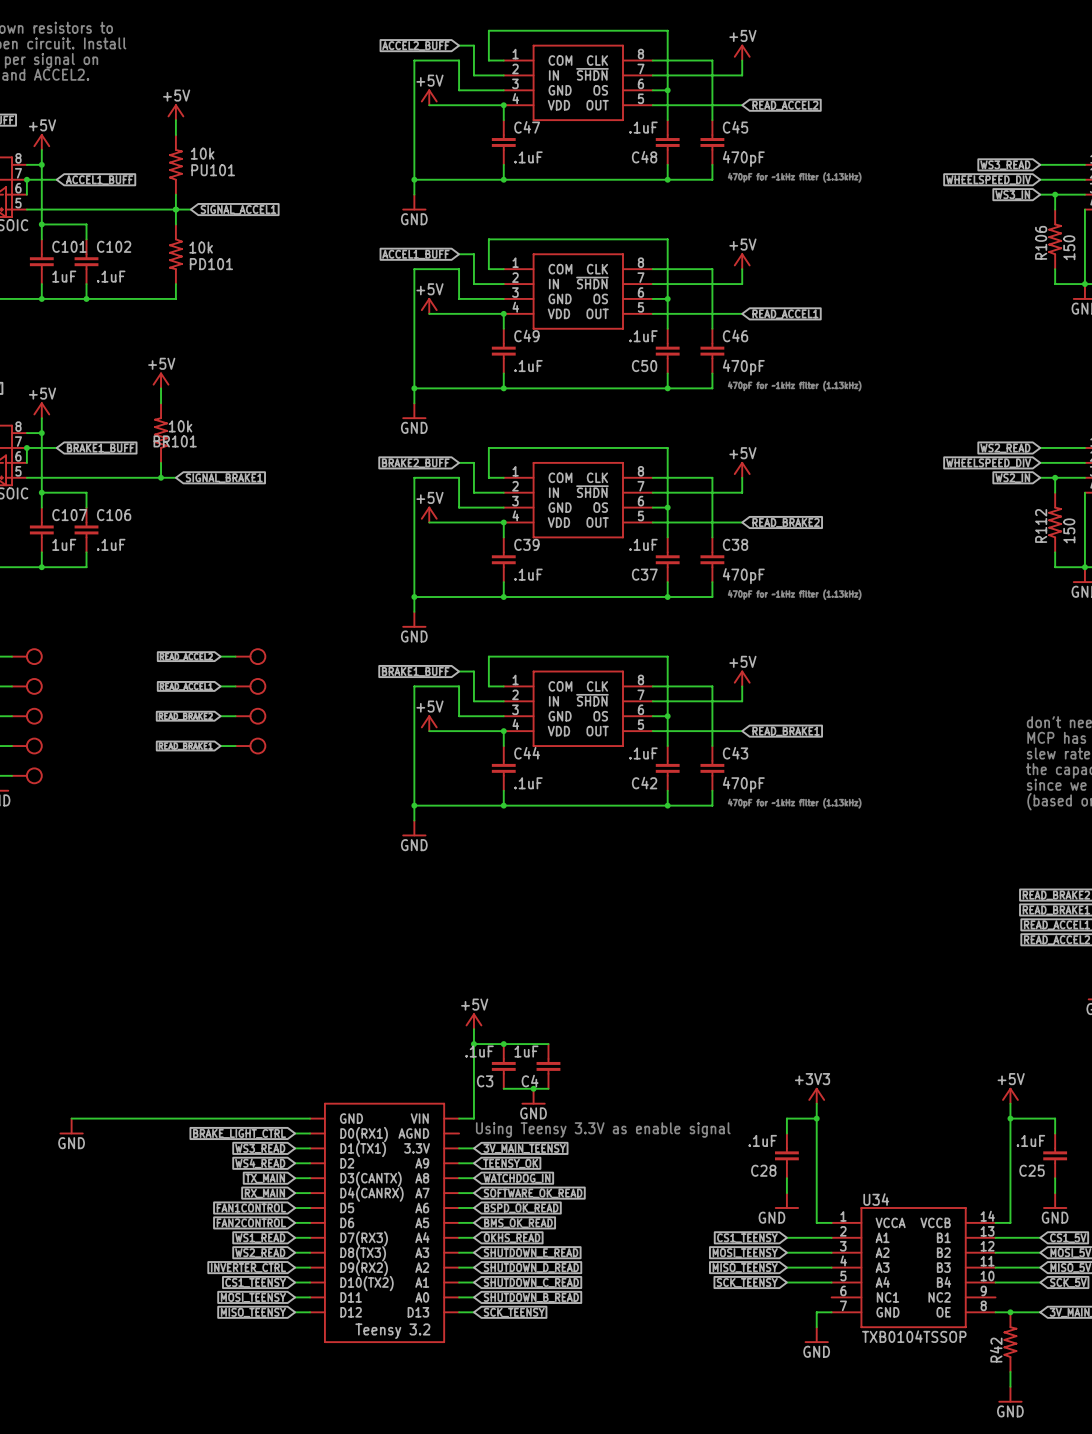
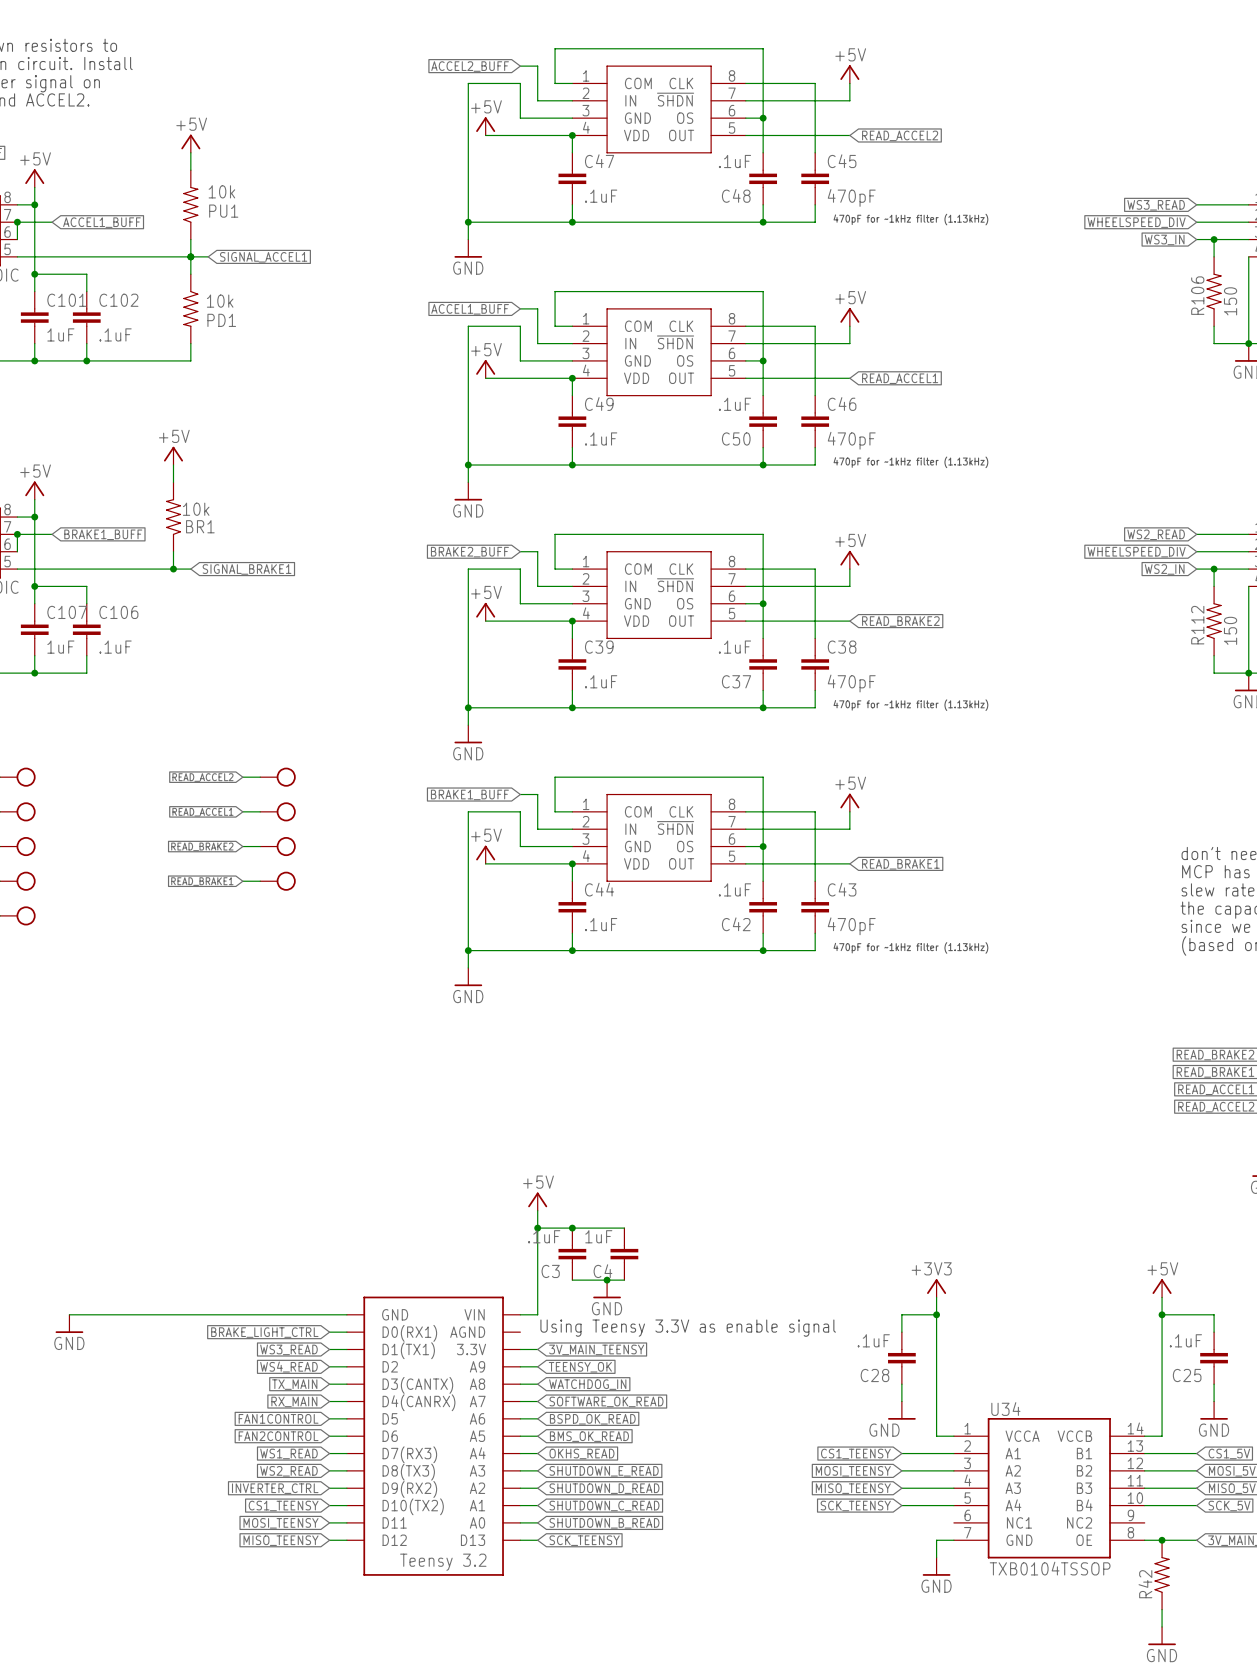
PU101 name: PU101 (213, 170) -> PU1 (223, 211)
PD101 name: PD101 (211, 264) -> PD1 (221, 320)
BR101 name: BR101 (175, 441) -> BR1 (200, 526)

